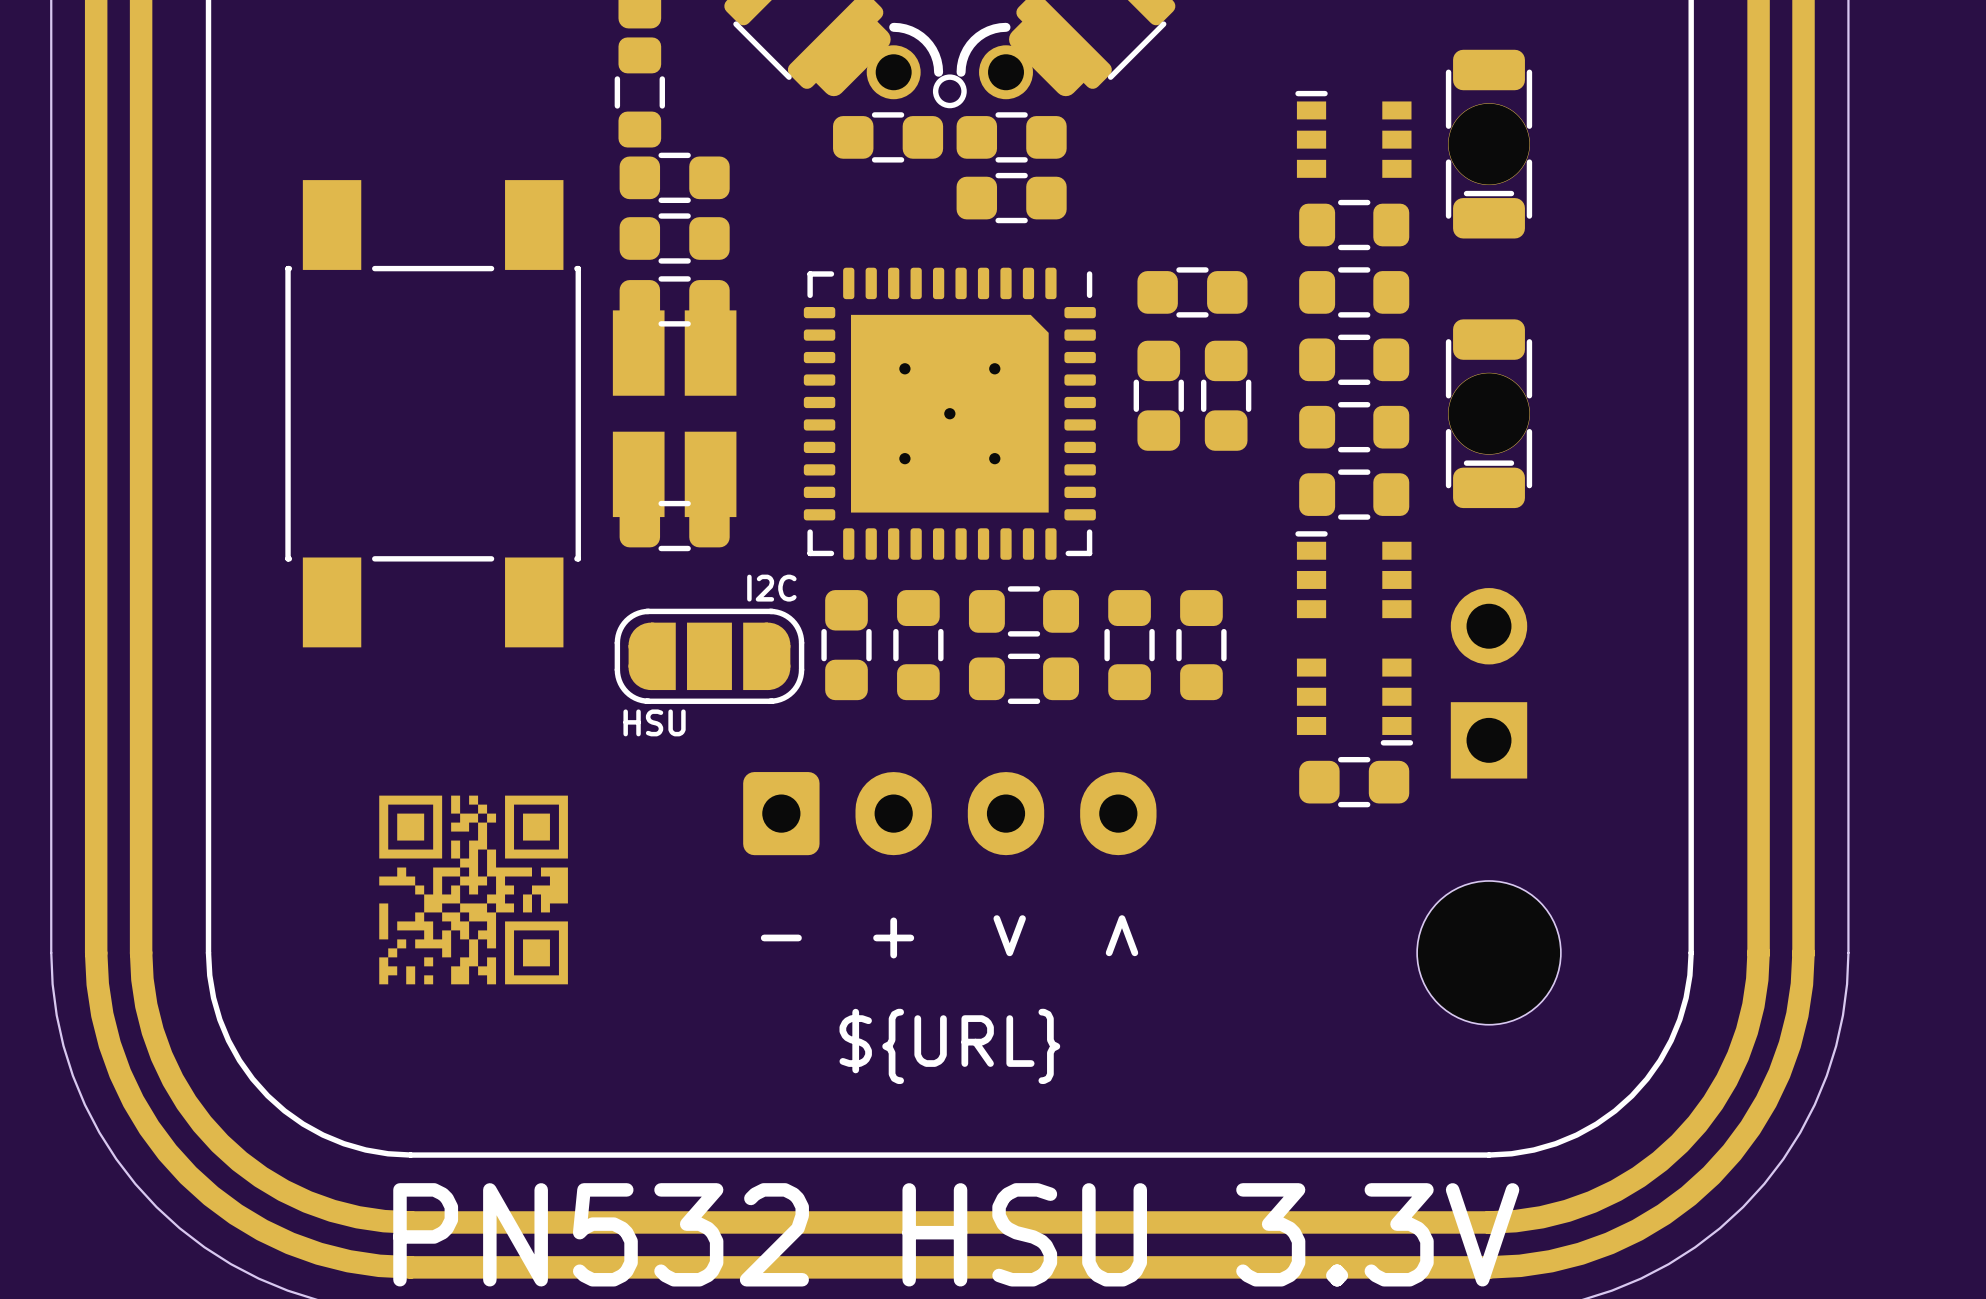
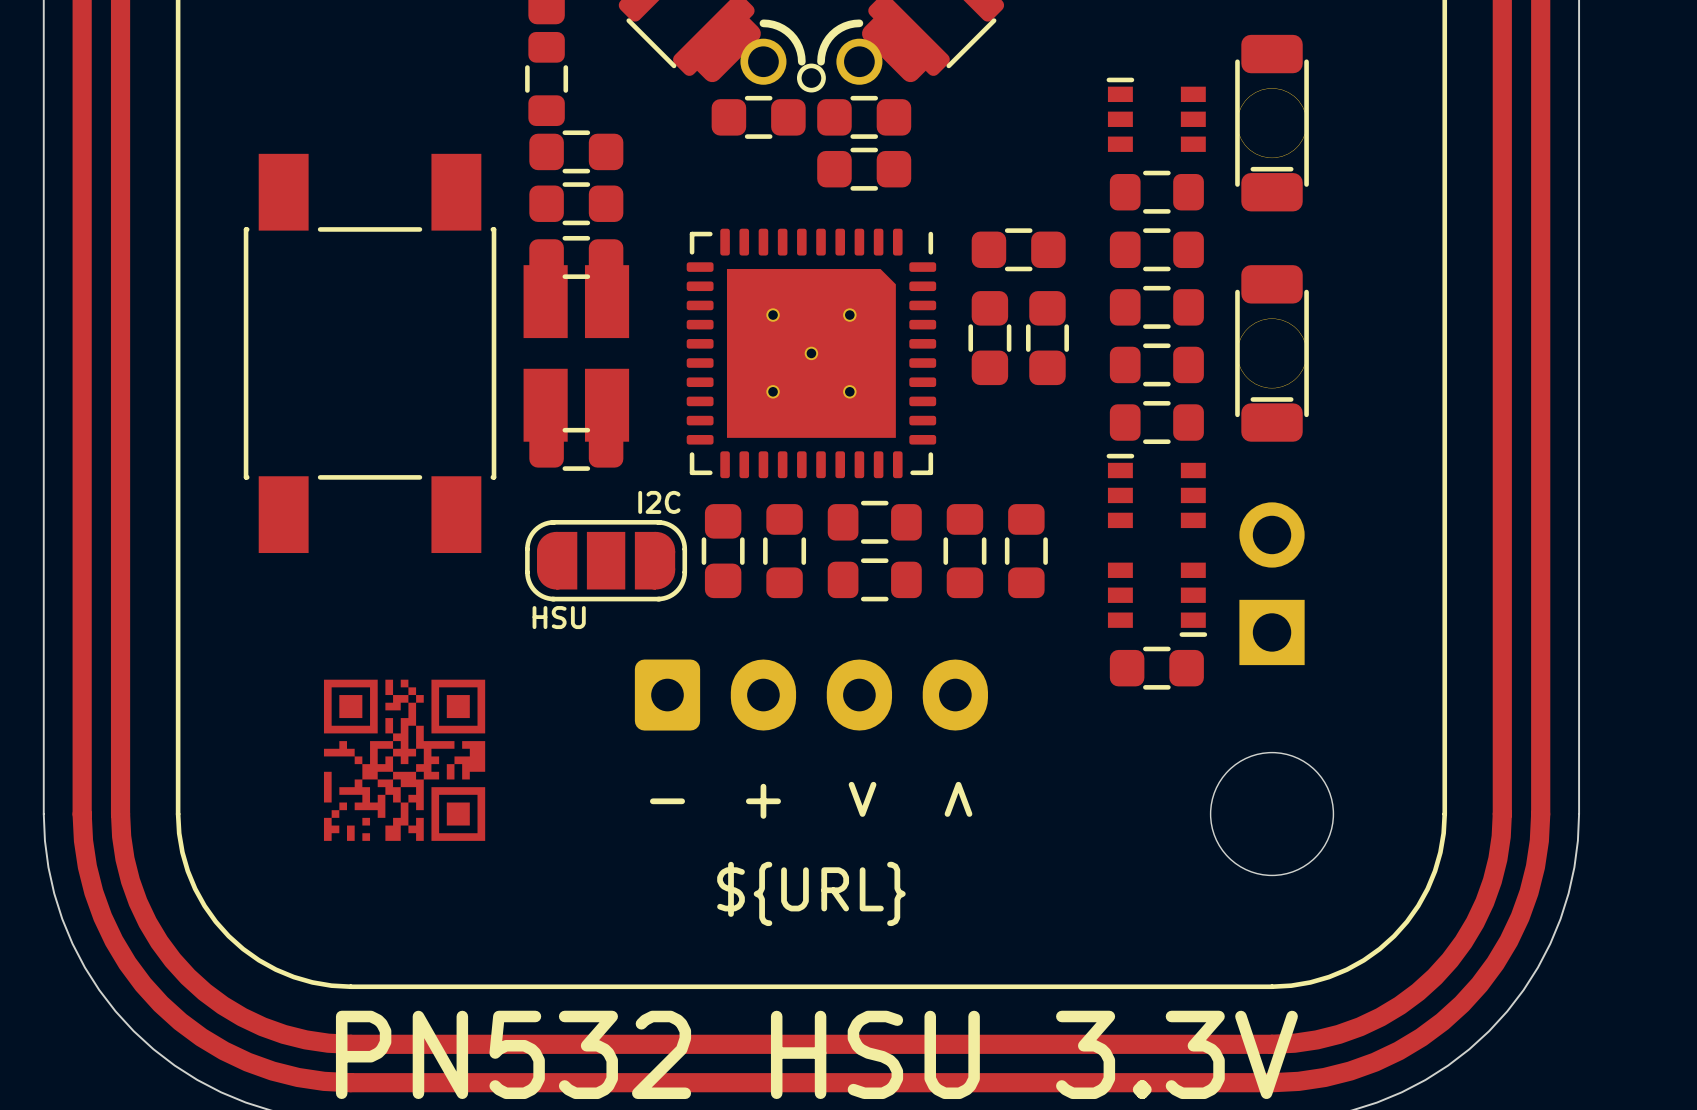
part footprint: [1445, 49, 1533, 239] -> [1235, 34, 1309, 212]
part footprint: [1445, 319, 1533, 509] -> [1235, 265, 1309, 442]

